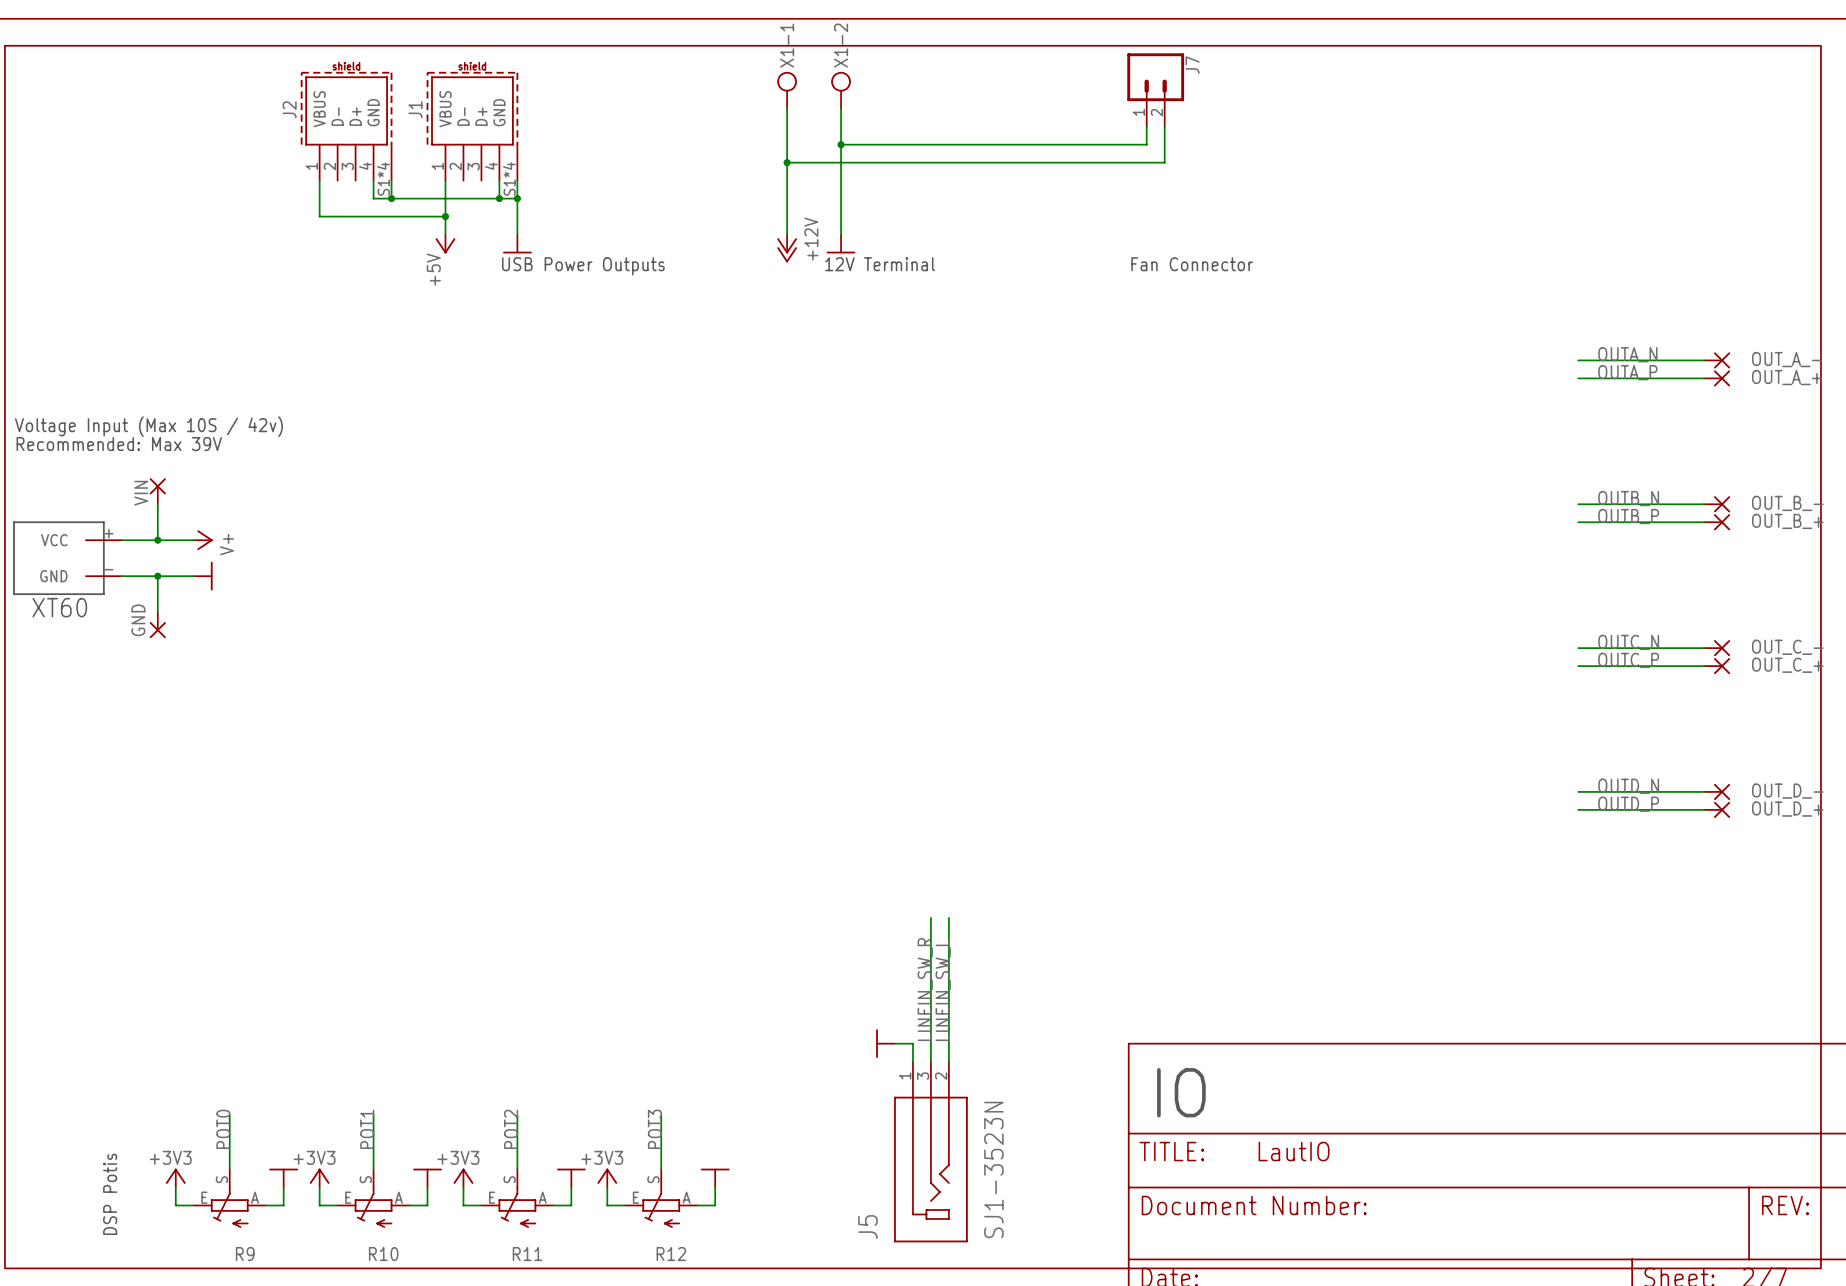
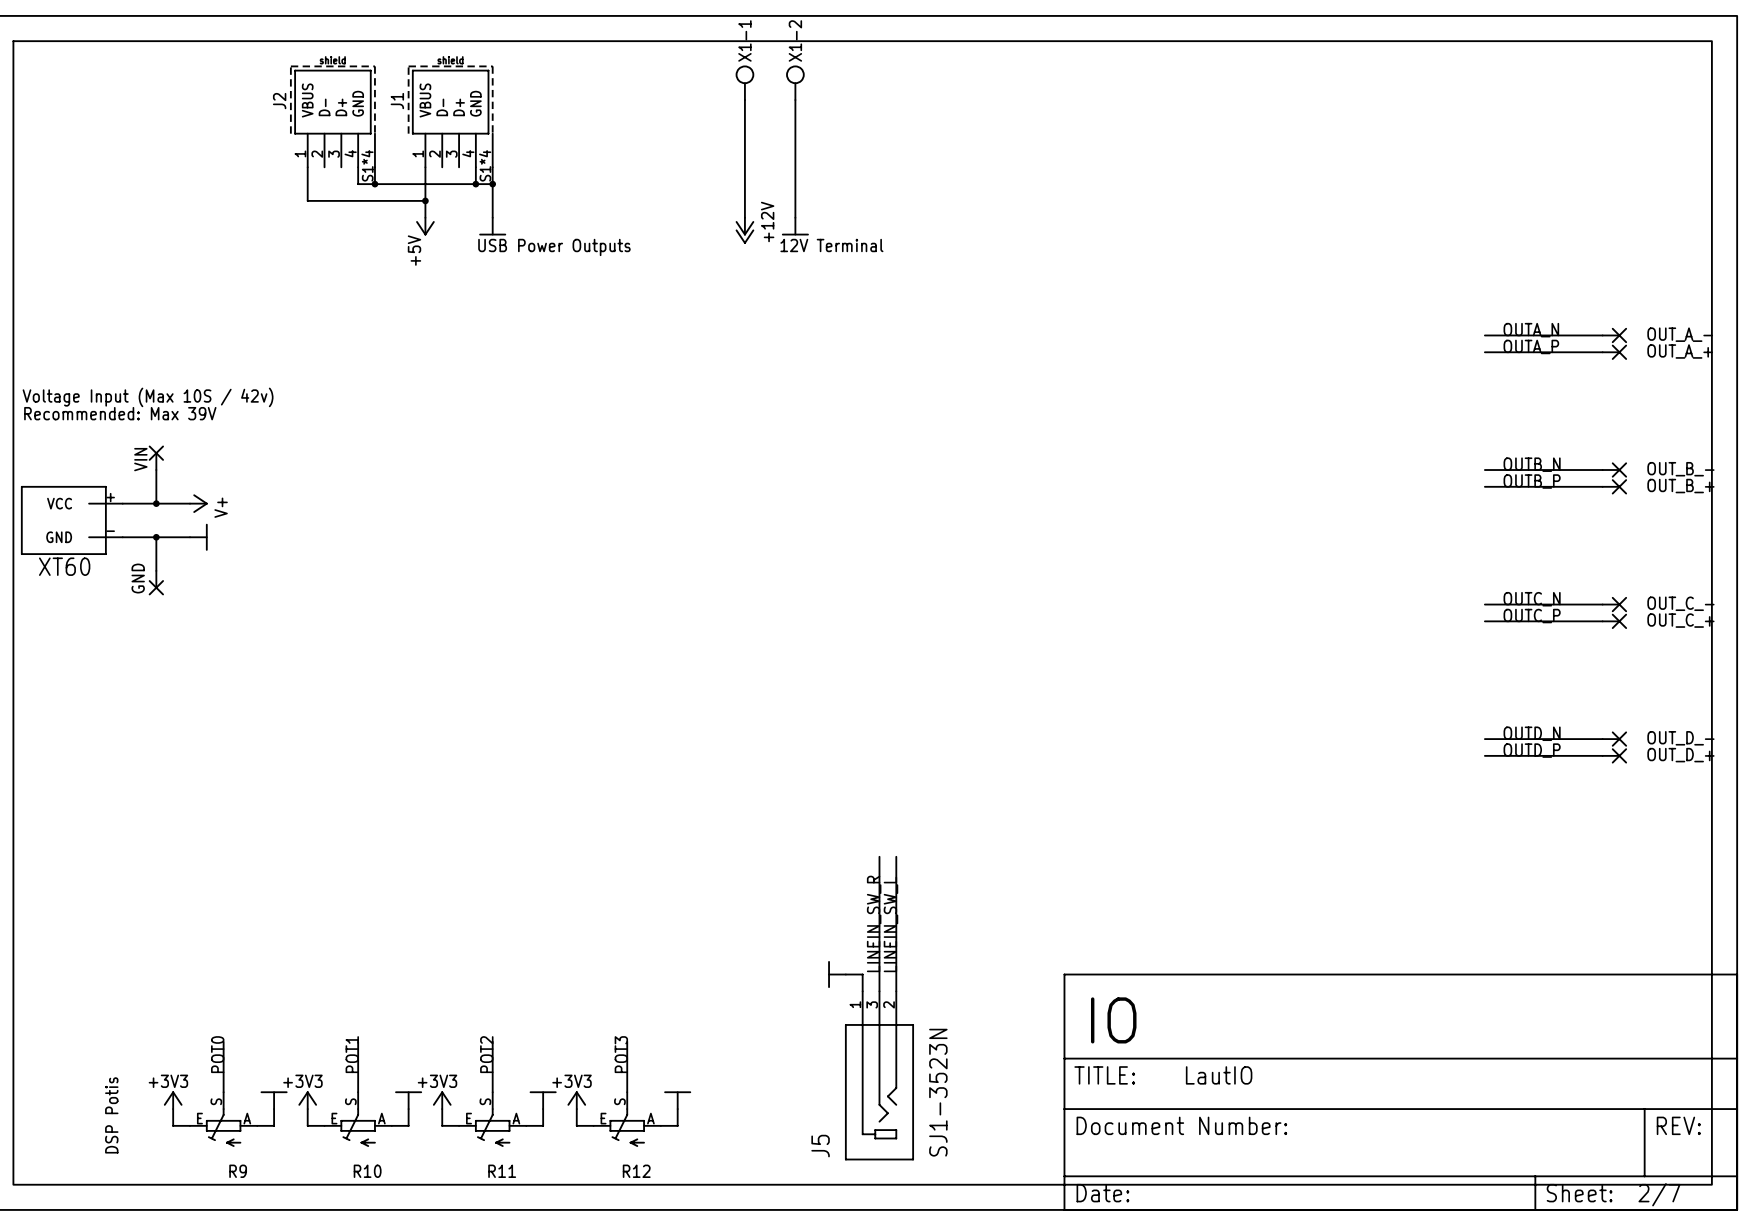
J7: (1155, 90) -> none
wire: (1146, 126) (1146, 144) (841, 144) -> none
wire: (1164, 126) (1164, 162) (787, 162) -> none
junction: (841, 144) -> none
junction: (787, 162) -> none
text: Fan Connector (1192, 264) -> none

